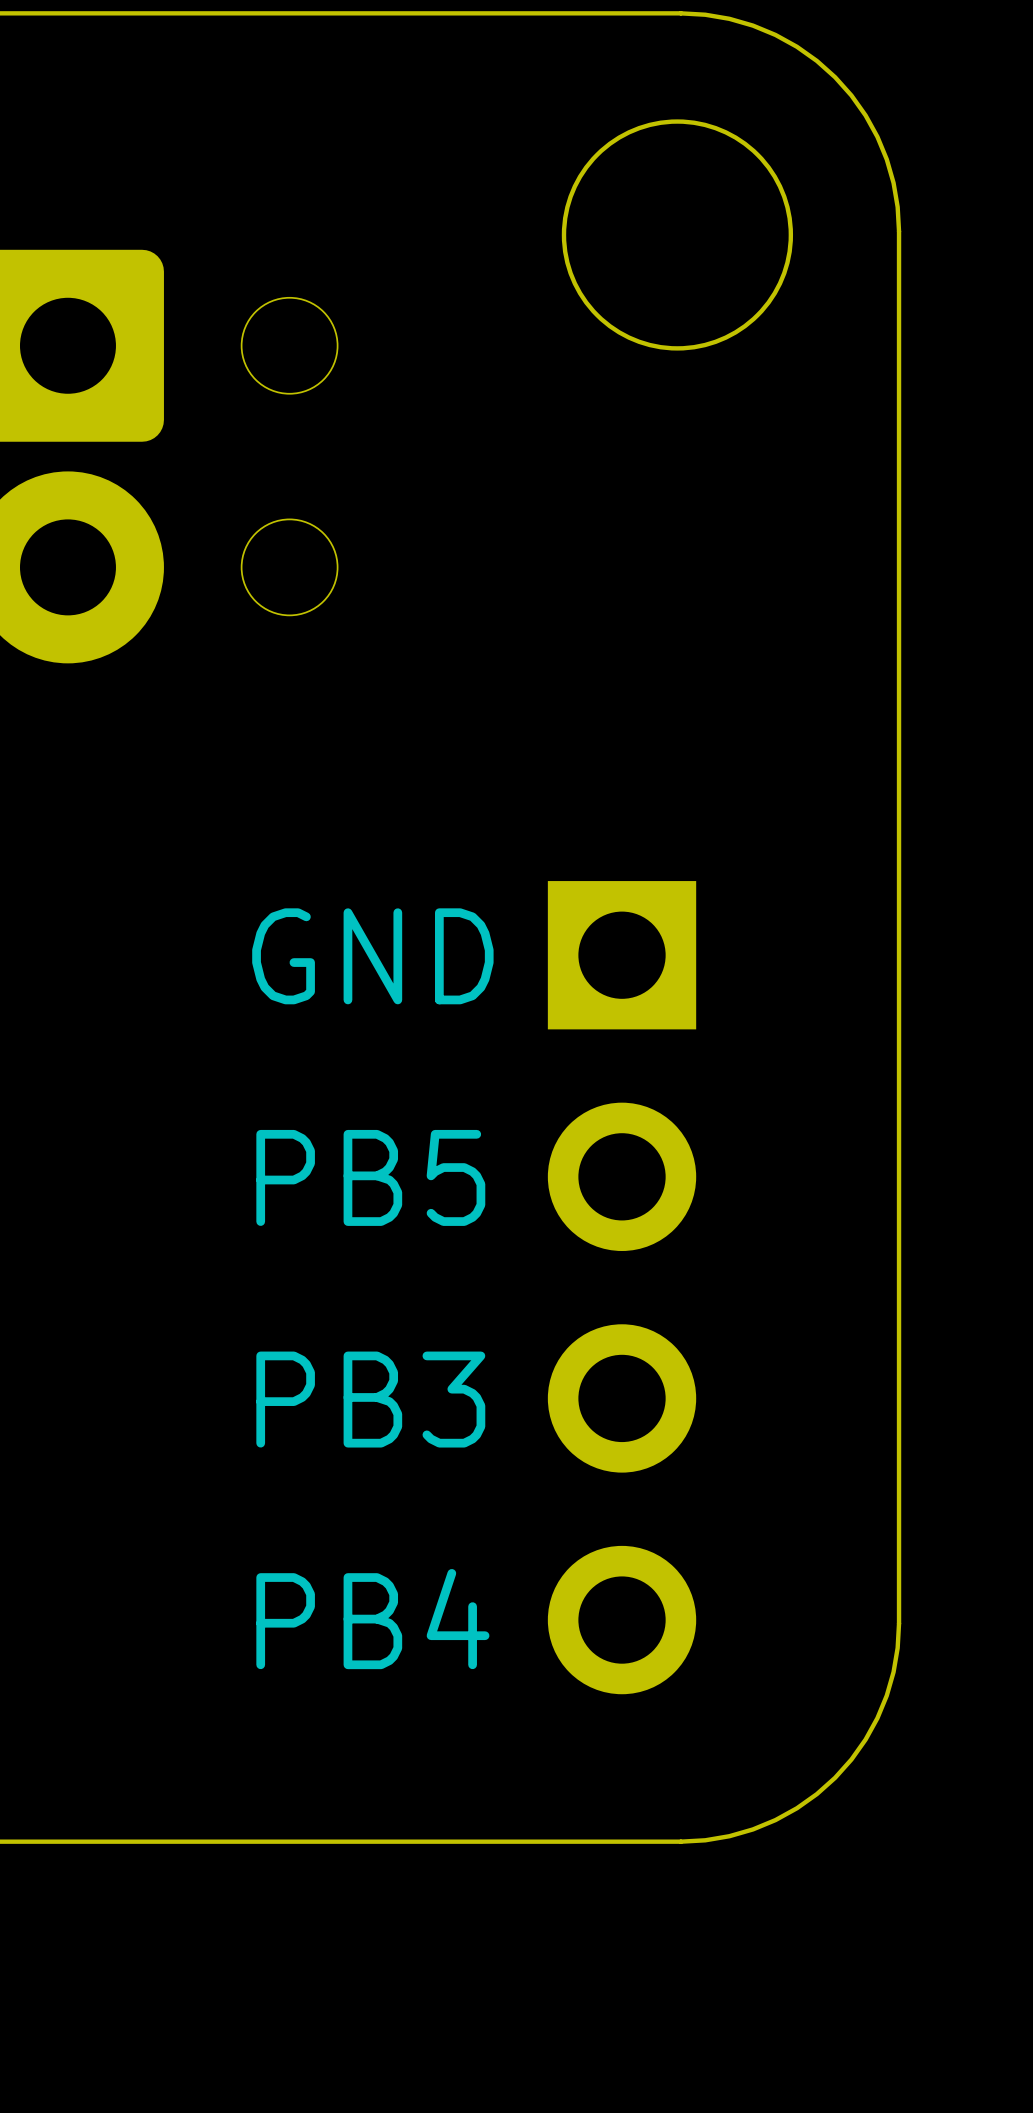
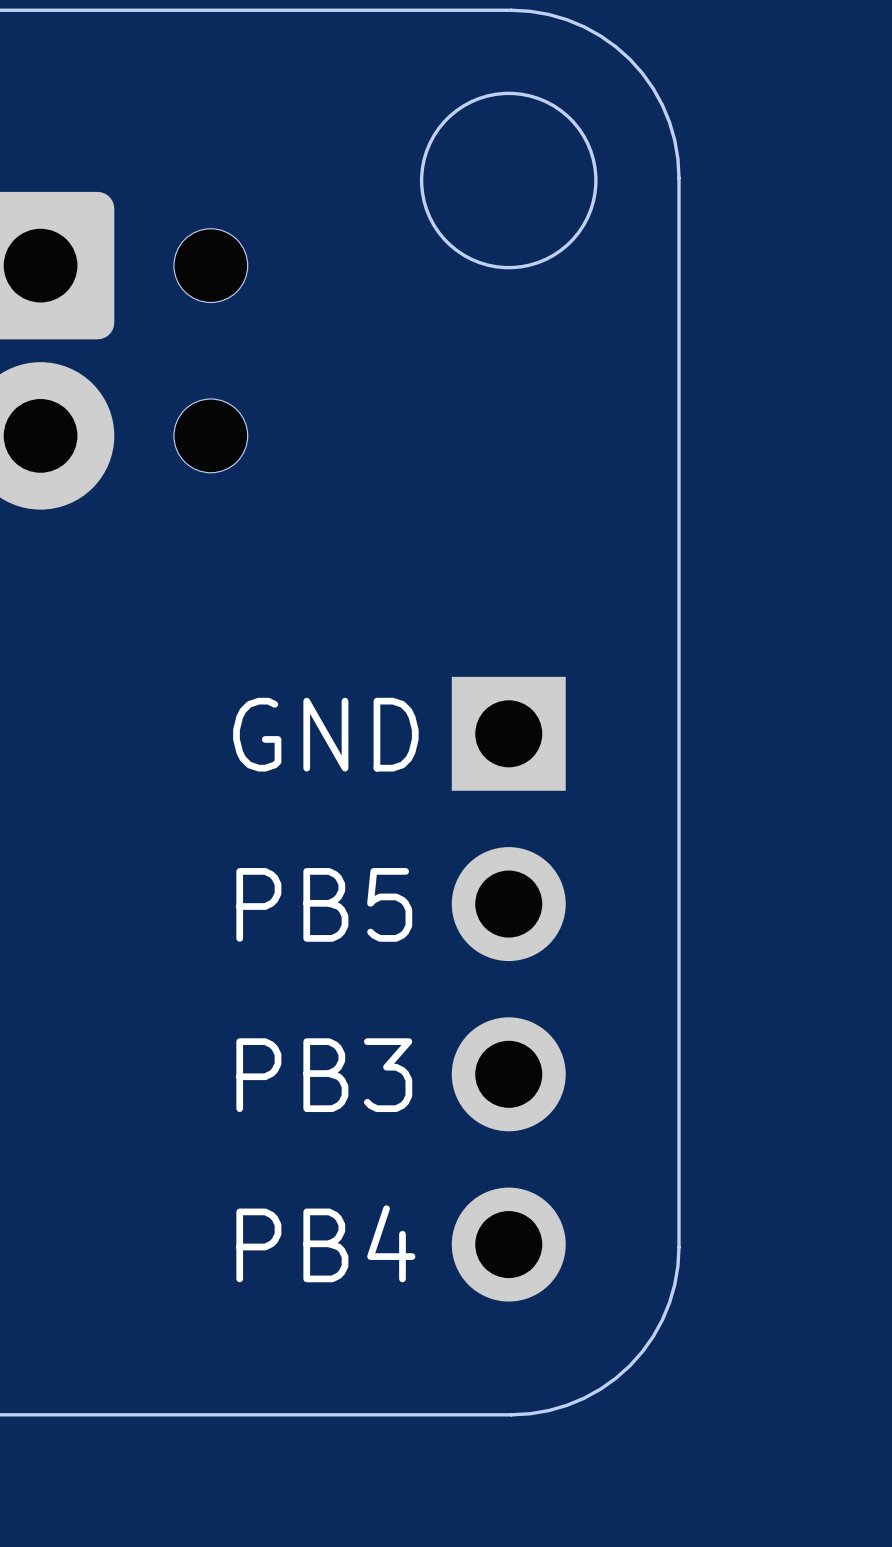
text position: GND (372, 956) -> GND (325, 734)
text position: PB5 (370, 1177) -> PB5 (324, 904)
part position: (622, 1287) -> (508, 989)
text position: PB3 (370, 1399) -> PB3 (324, 1075)
text position: PB4 (372, 1619) -> PB4 (325, 1243)

